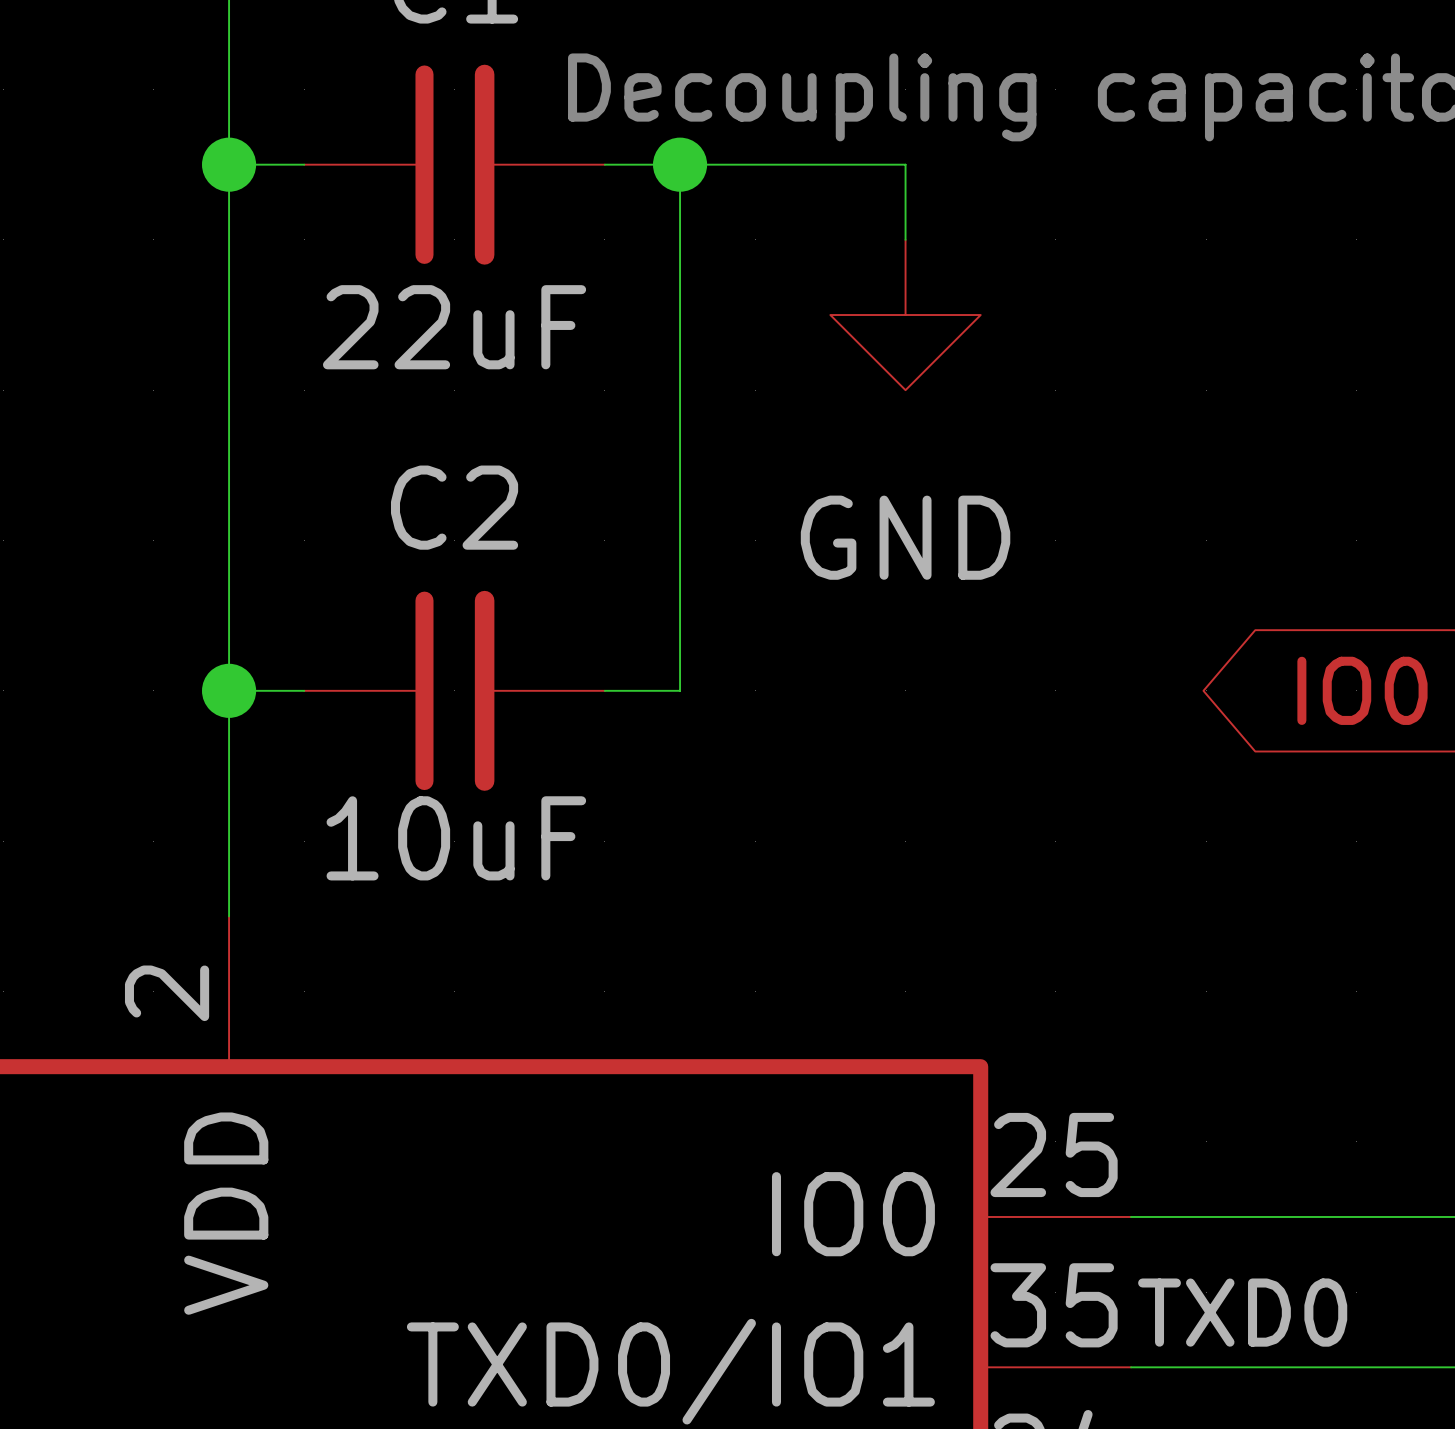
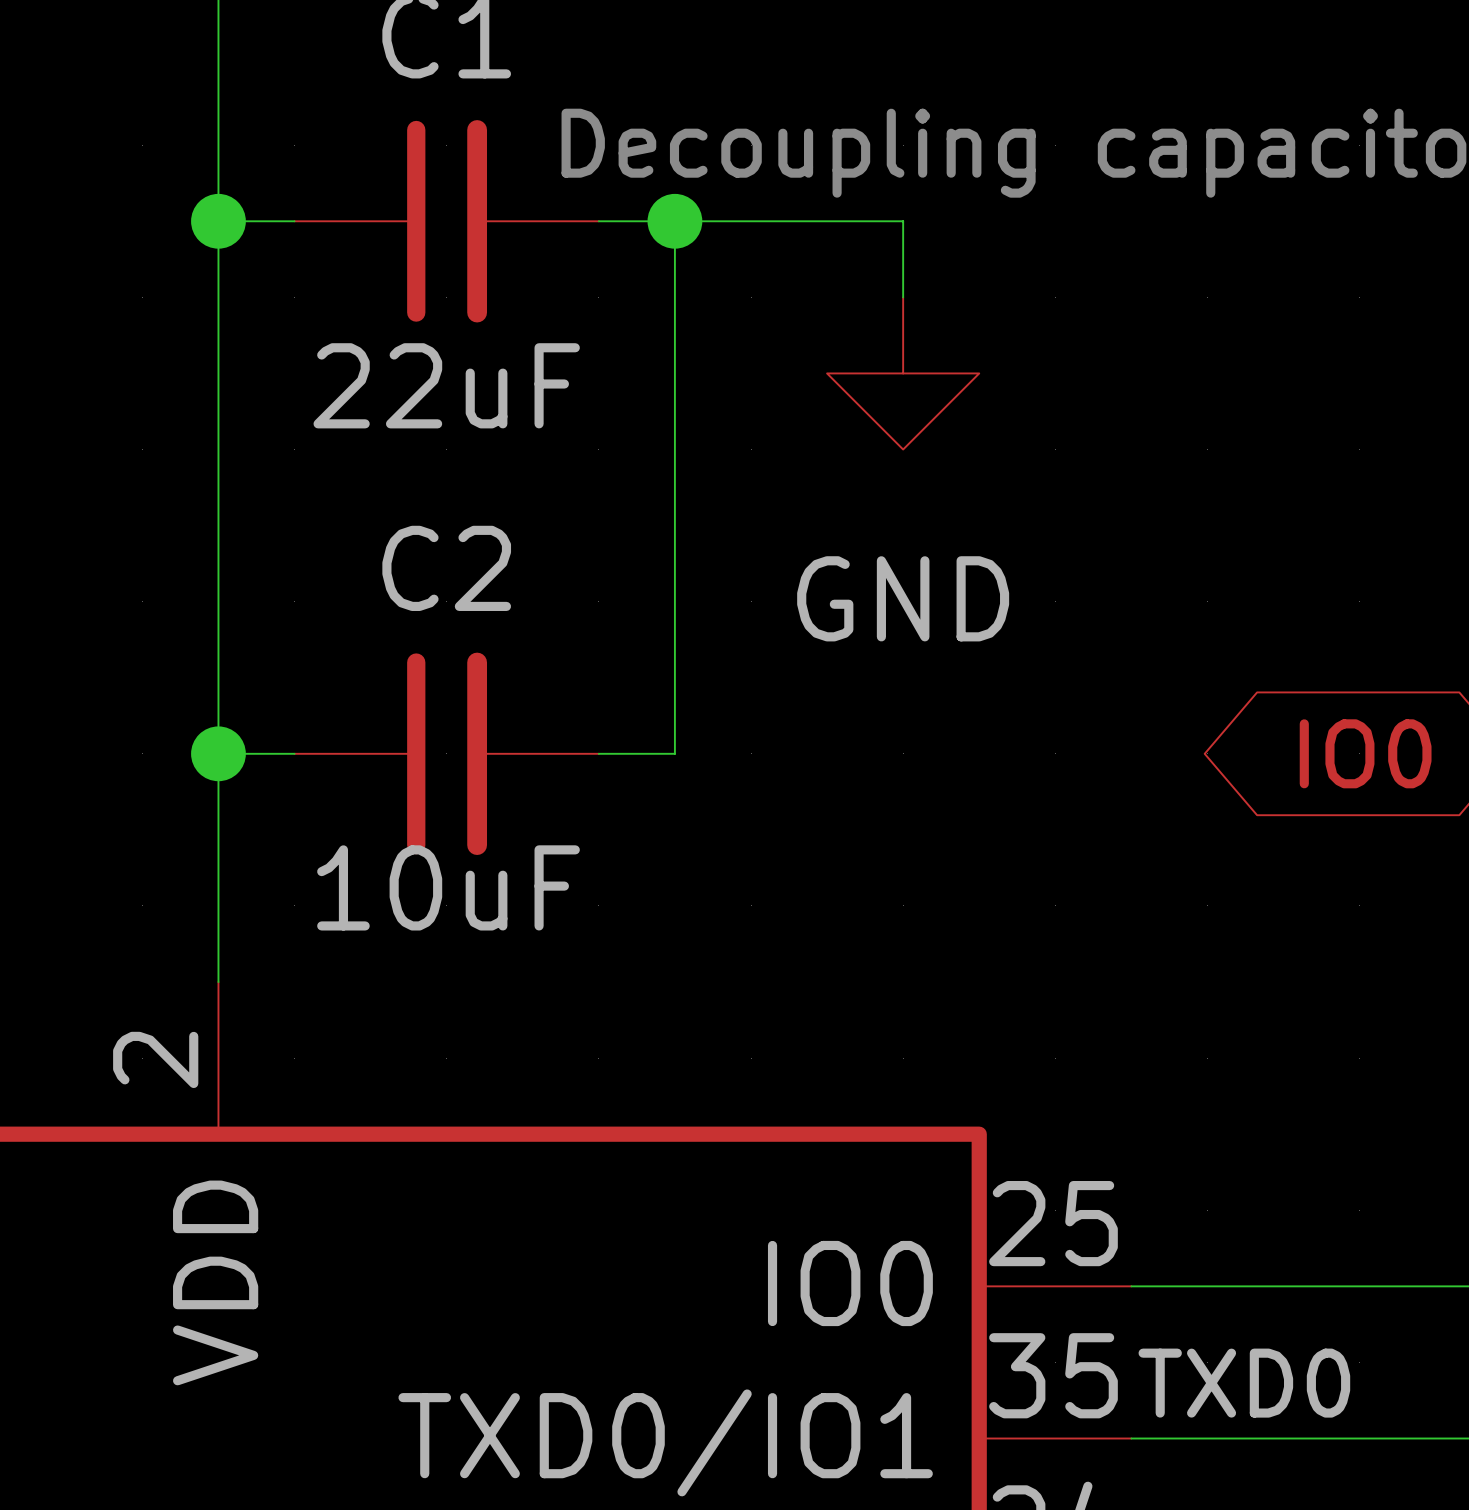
C2 value position: 10uF (456, 838) -> 10uF (448, 887)

